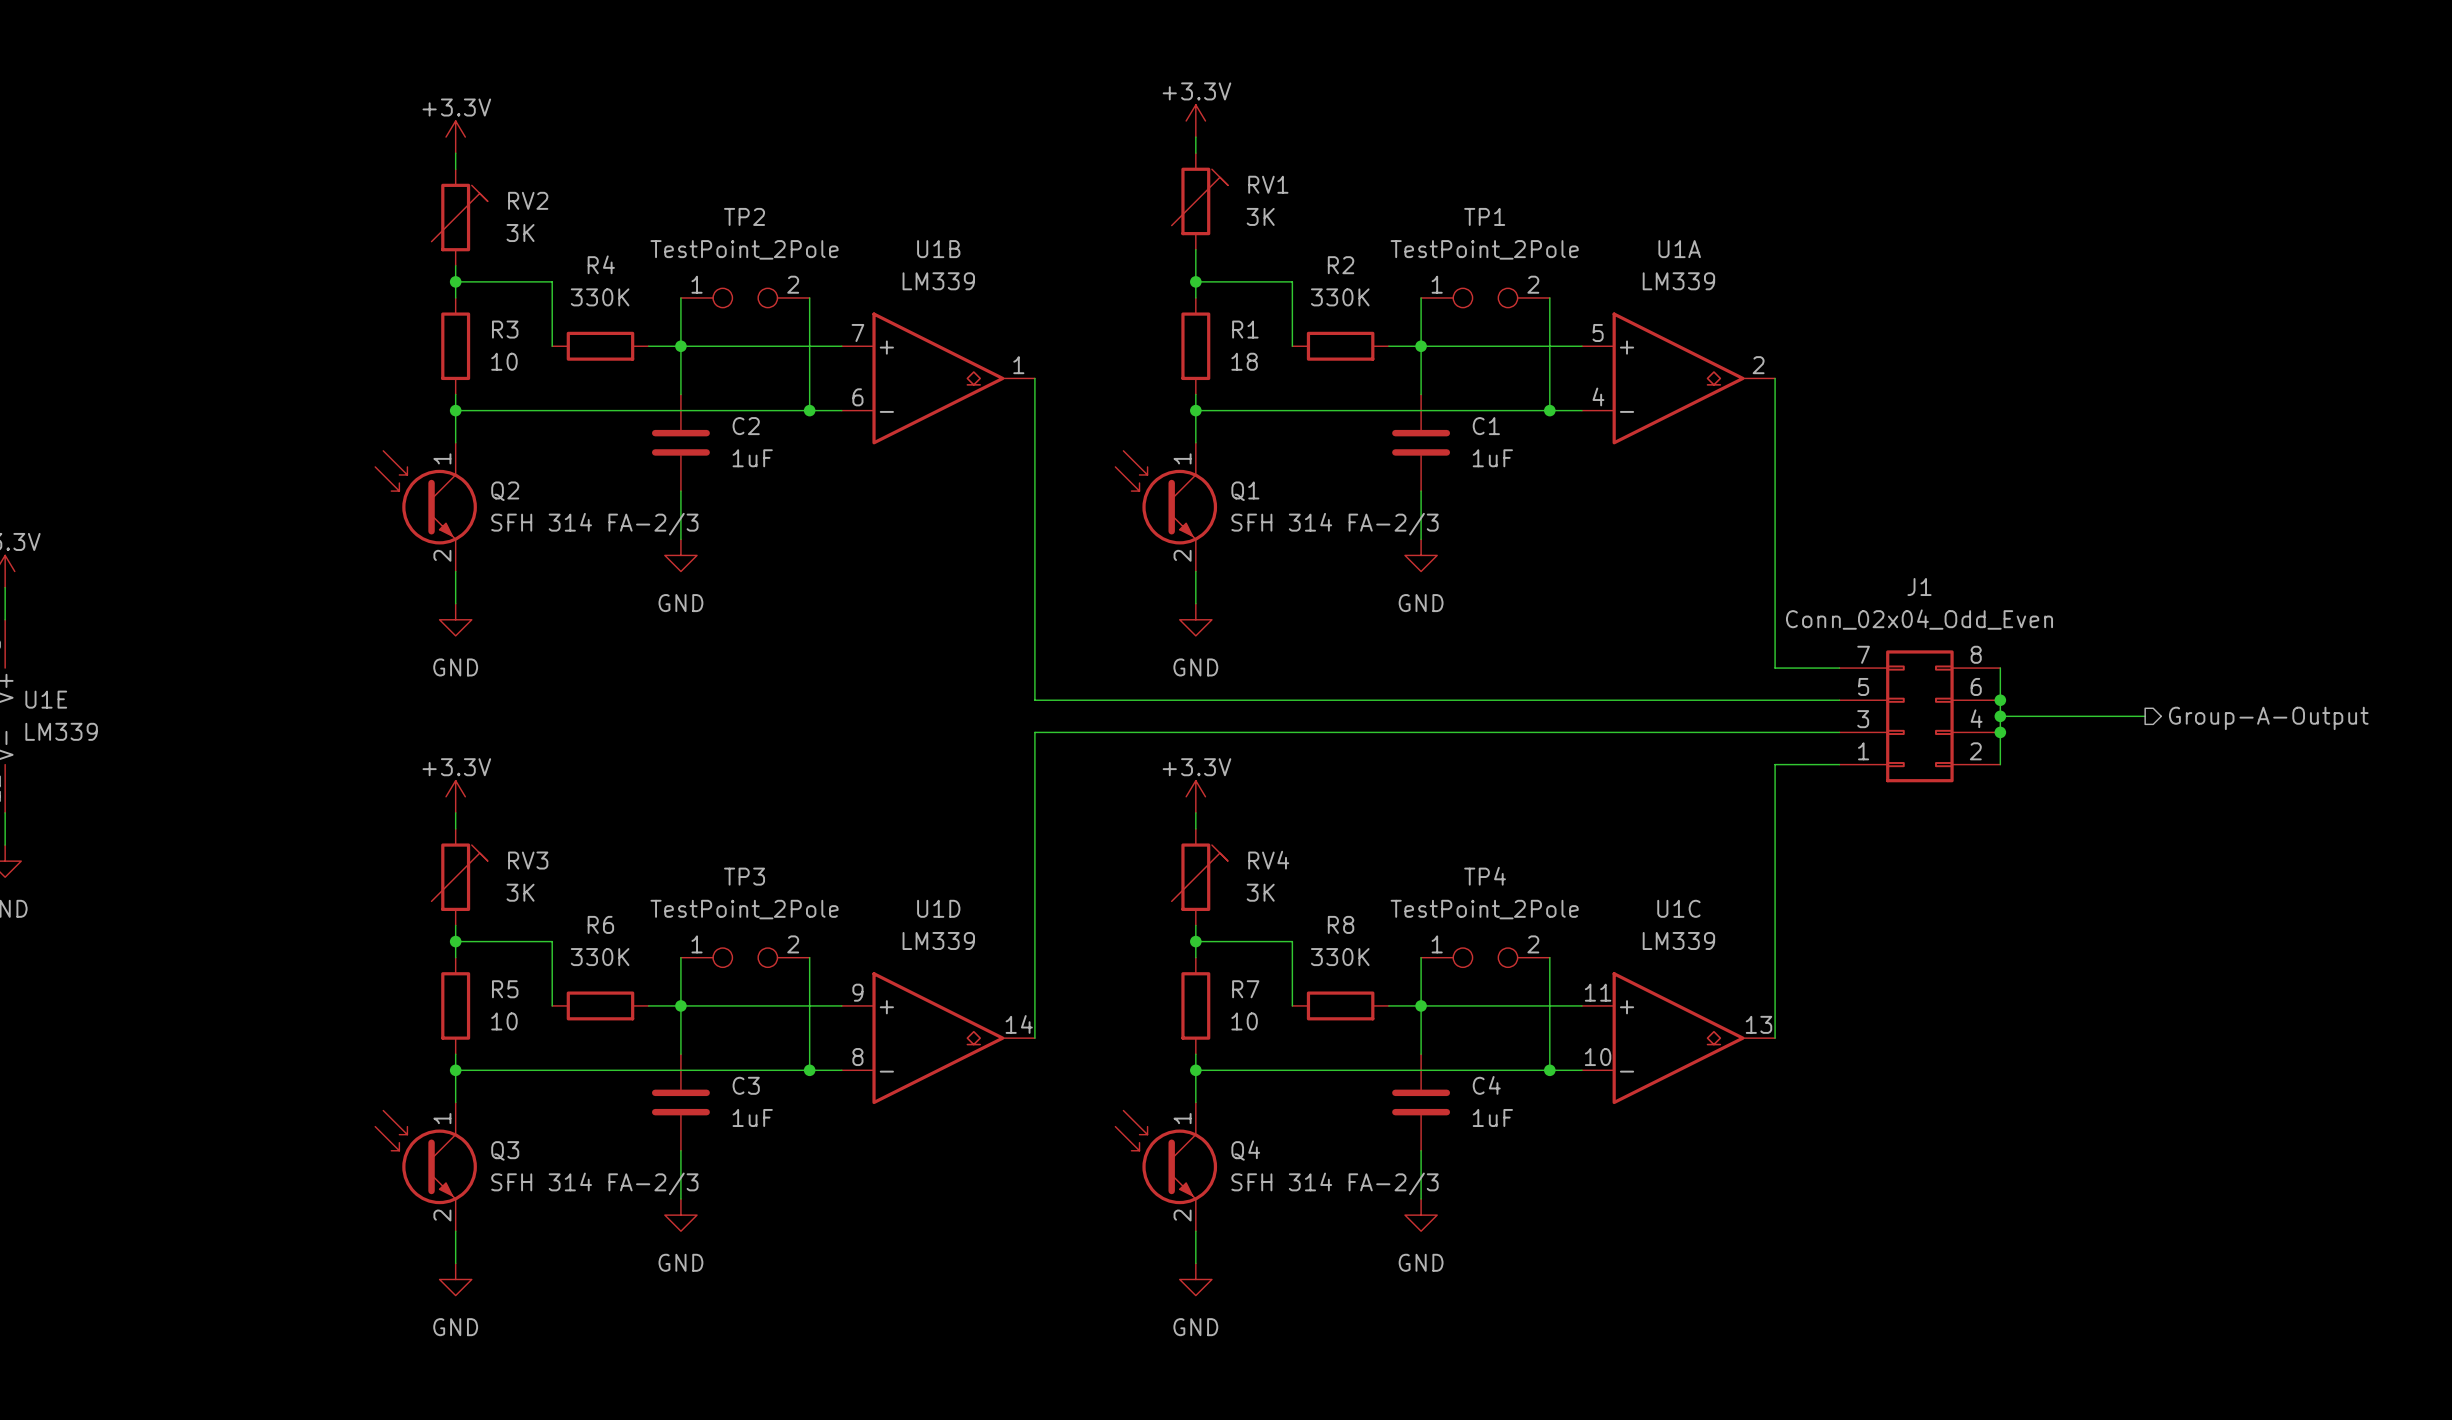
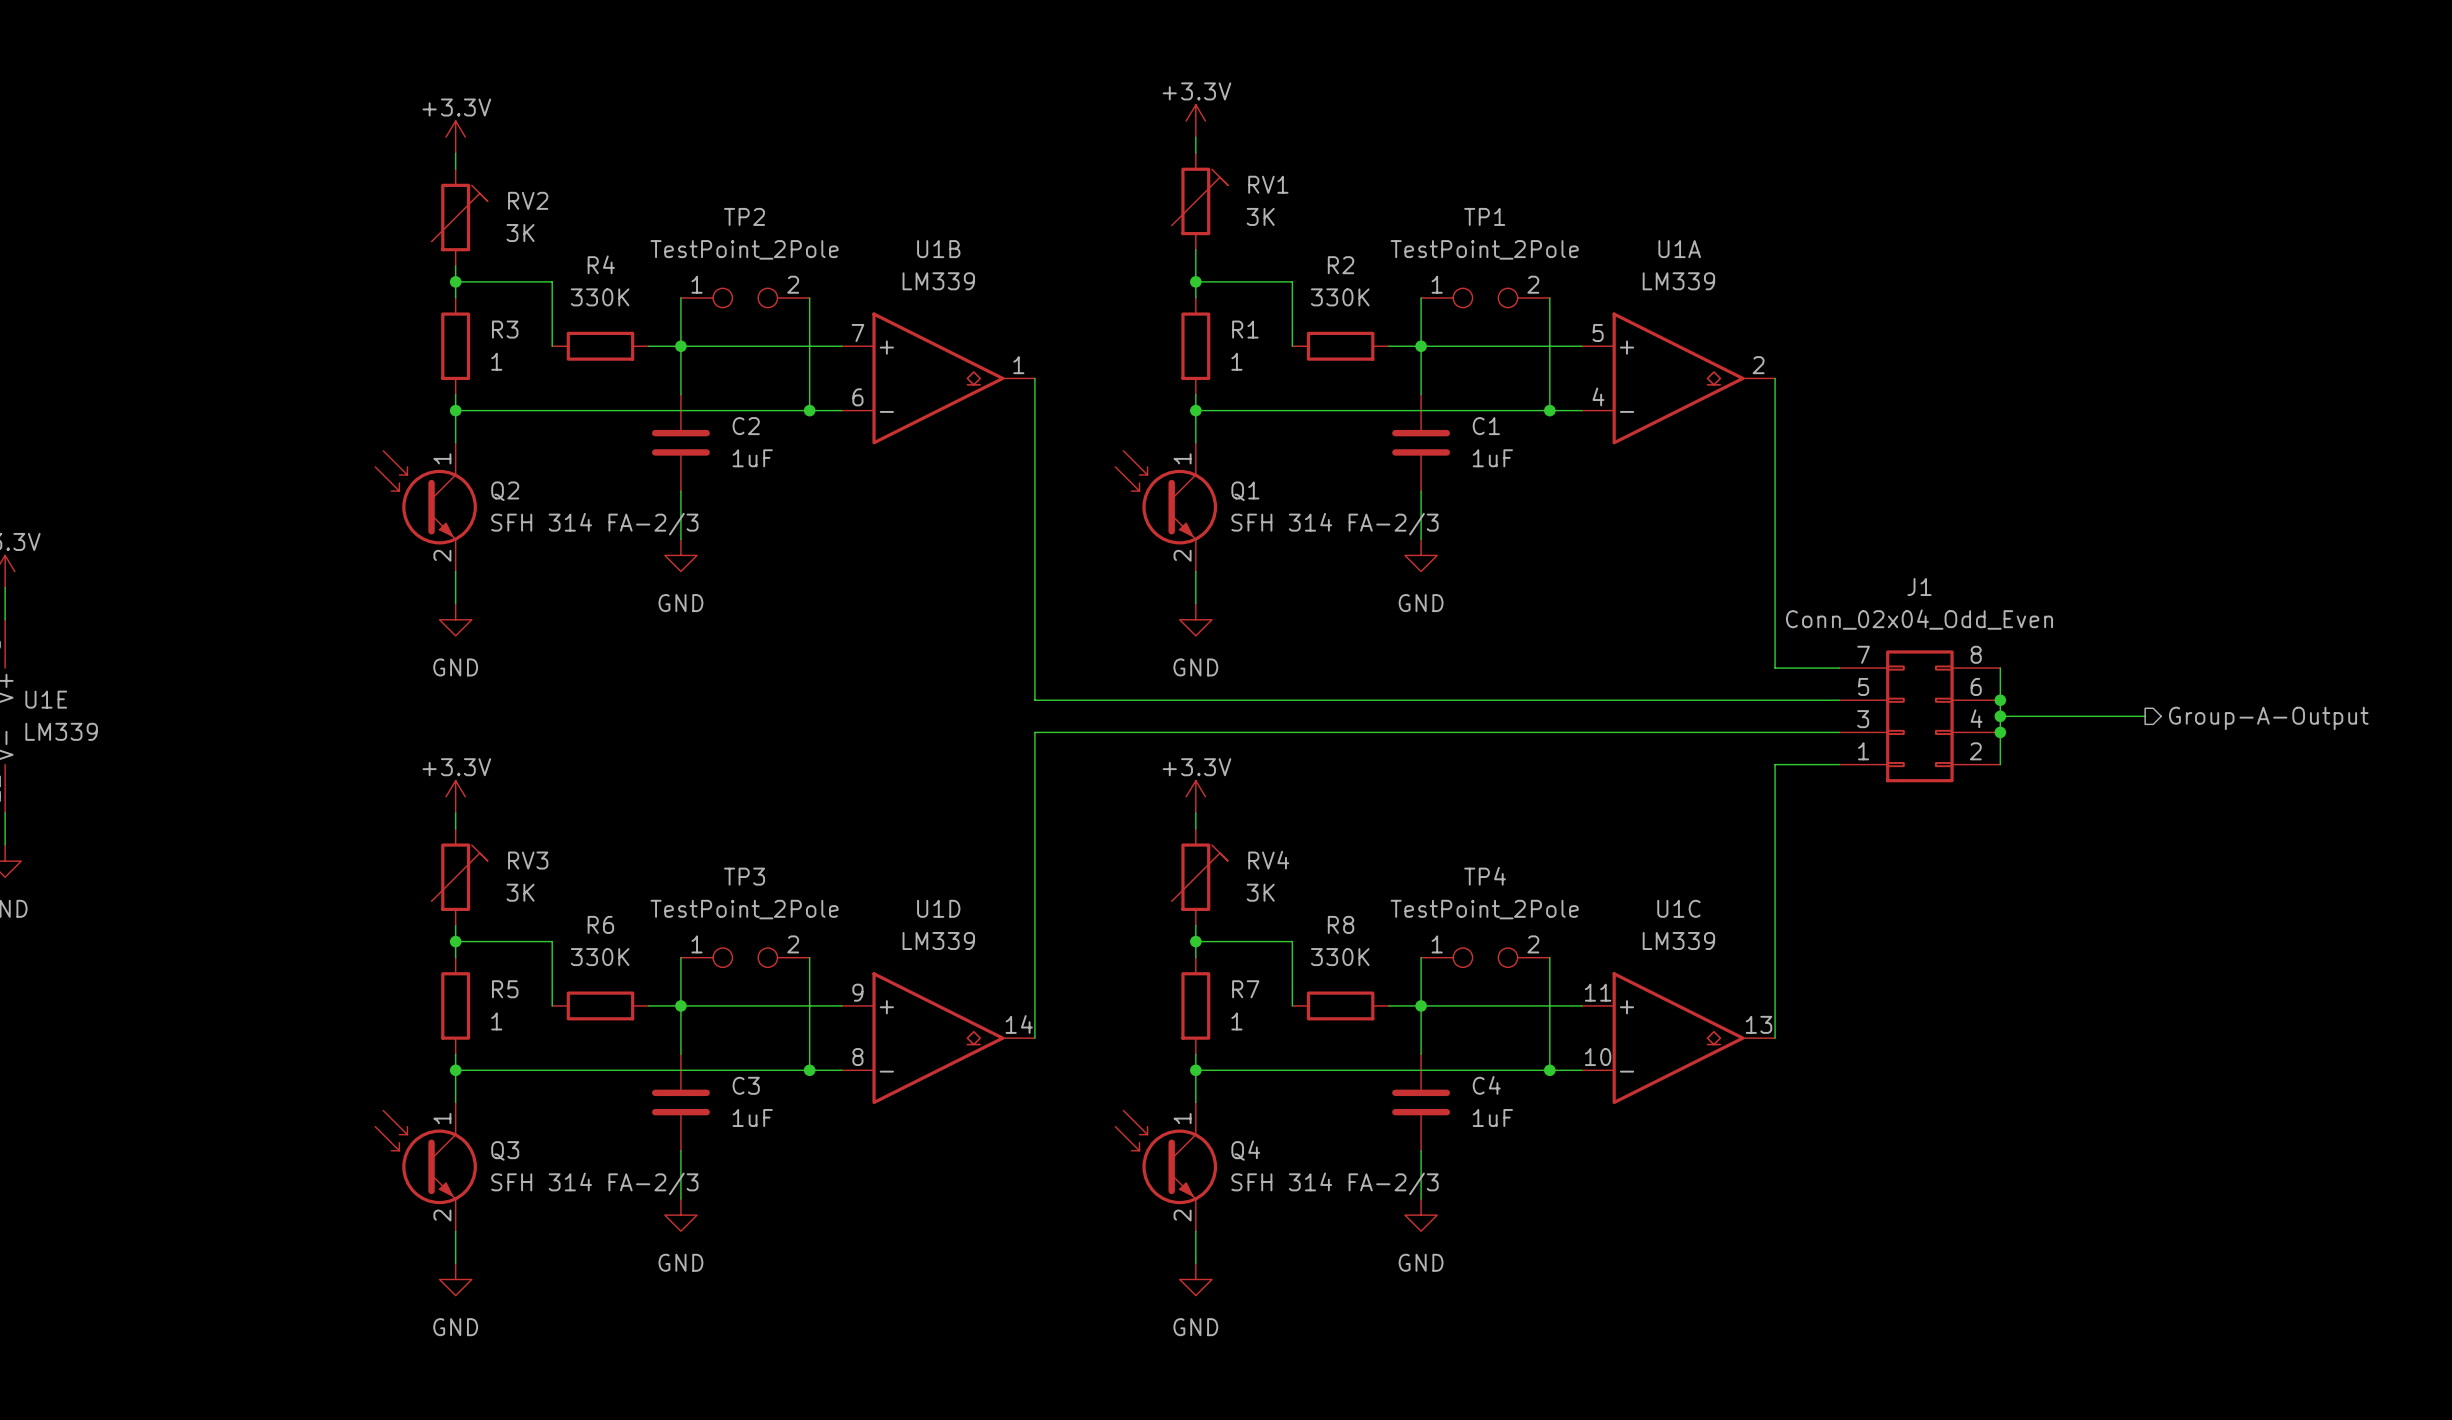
R3 value: 10 (504, 361) -> 1 (496, 361)
R1 value: 18 (1244, 361) -> 1 (1236, 361)
R5 value: 10 (504, 1021) -> 1 (496, 1021)
R7 value: 10 (1244, 1021) -> 1 (1236, 1021)

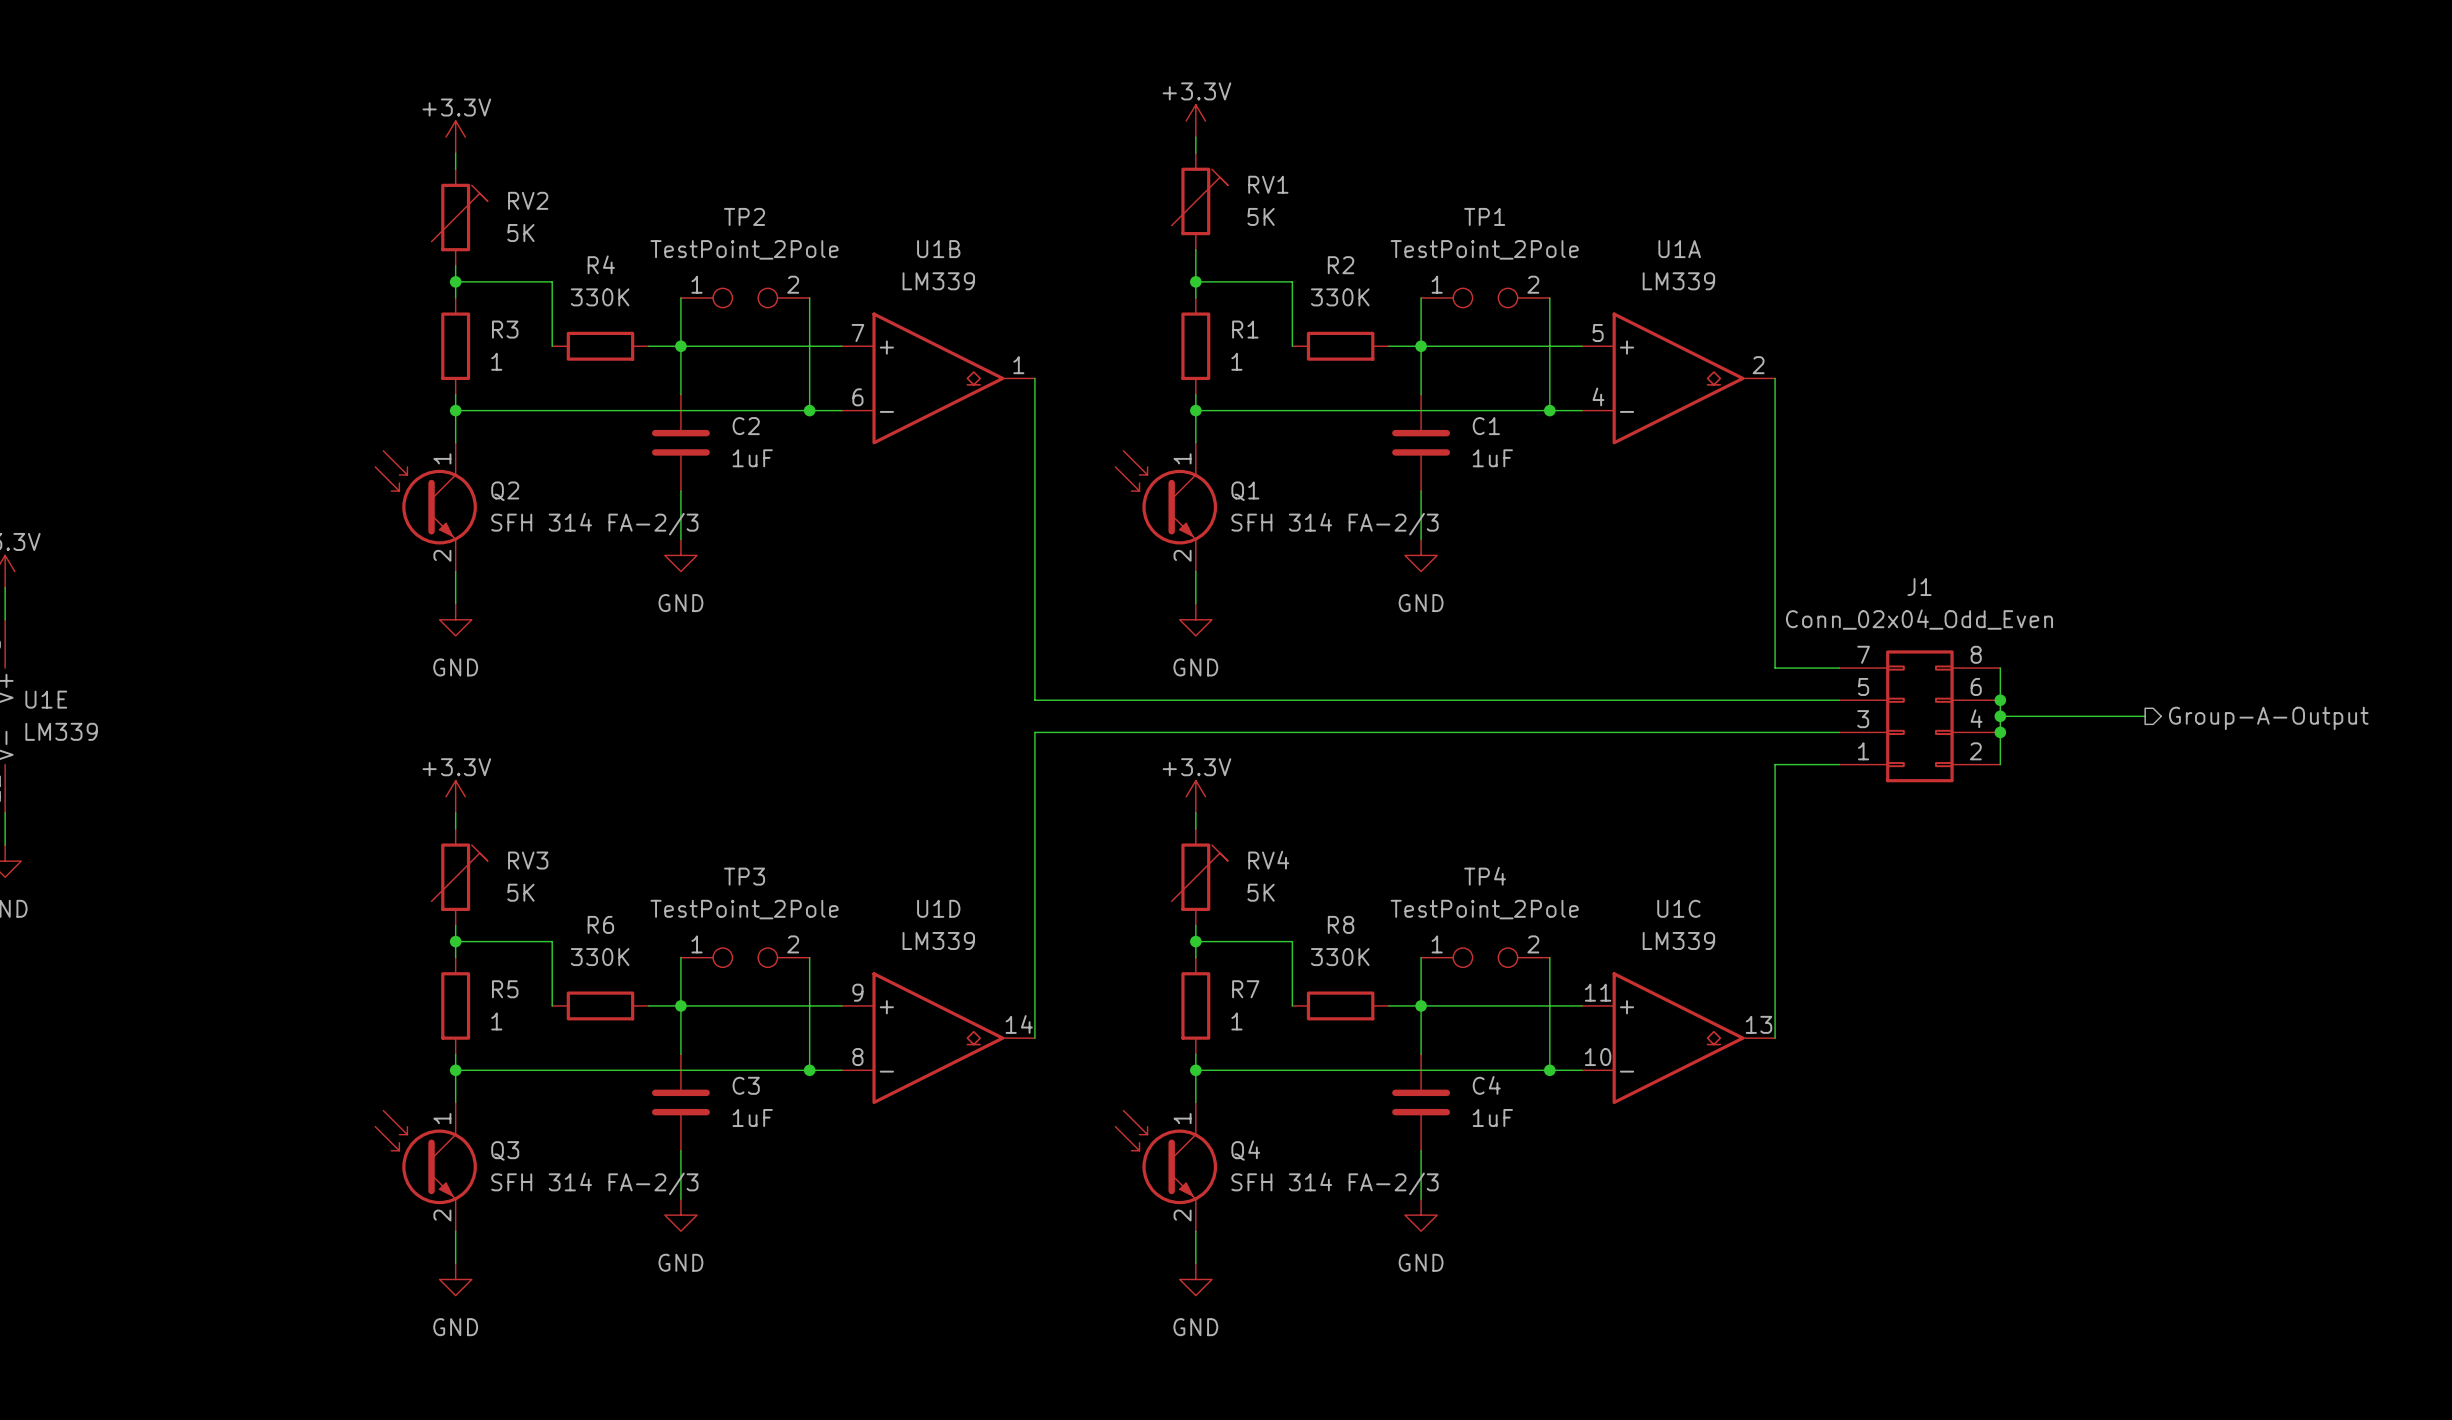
RV1 value: 3K (1260, 216) -> 5K (1261, 216)
RV2 value: 3K (520, 233) -> 5K (520, 233)
RV3 value: 3K (520, 892) -> 5K (520, 892)
RV4 value: 3K (1260, 892) -> 5K (1261, 892)

